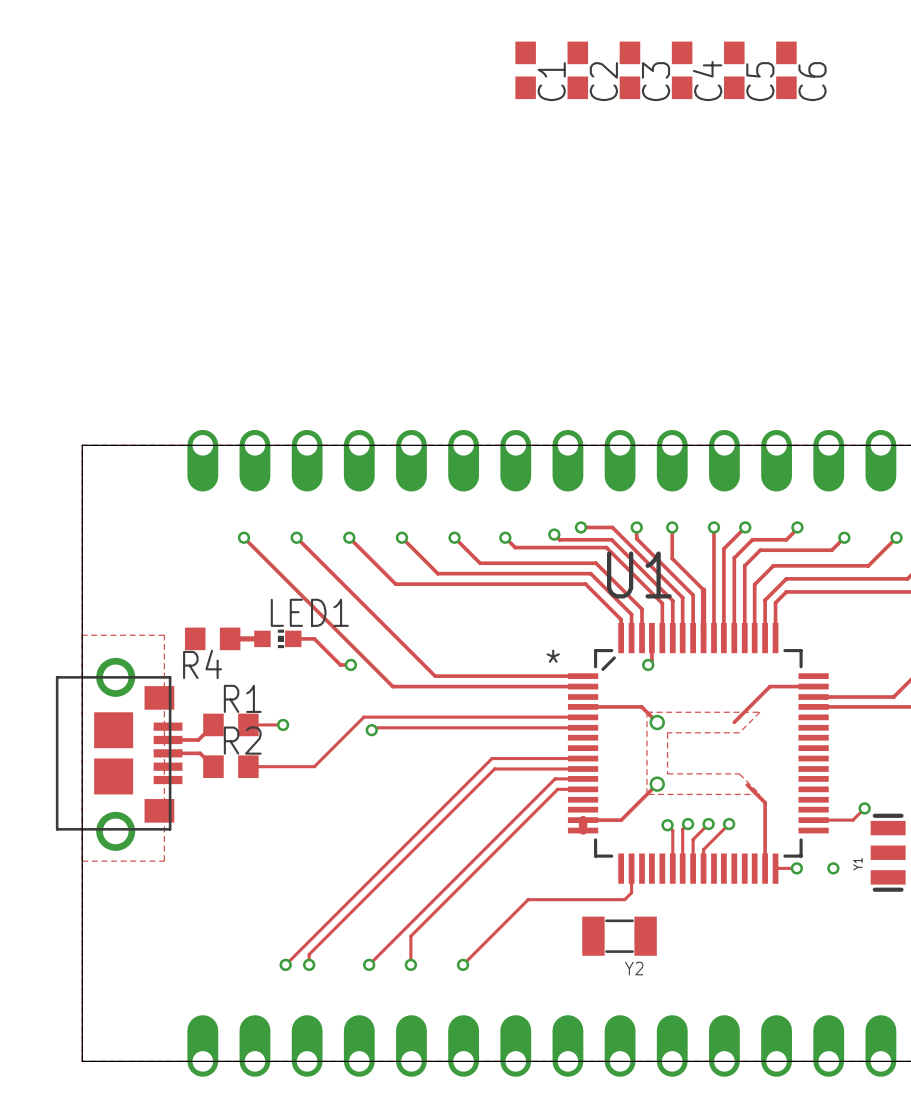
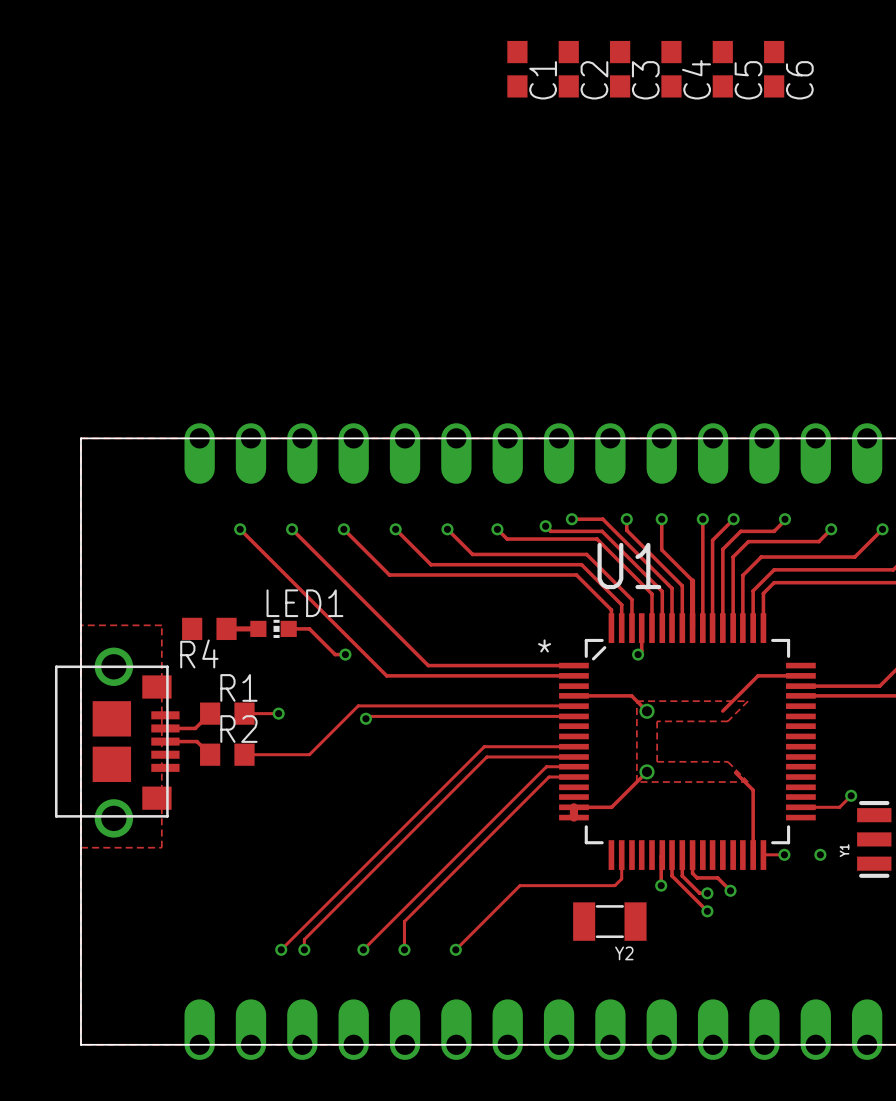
track: (688, 824) (682, 829) (682, 868) -> (707, 911) (672, 875) (672, 855)
via: (688, 824) -> none
track: (708, 824) (693, 839) (693, 868) -> (707, 893) (699, 893) (682, 875) (682, 855)
via: (708, 824) -> none
track: (729, 824) (703, 849) (703, 868) -> (730, 890) (717, 877) (697, 877) (692, 873) (692, 855)
via: (729, 824) -> none
track: (667, 825) (672, 830) (672, 868) -> (661, 885) (662, 855)
via: (667, 825) -> none
via: none -> (661, 885)
via: none -> (730, 890)
via: none -> (707, 893)
via: none -> (707, 911)

